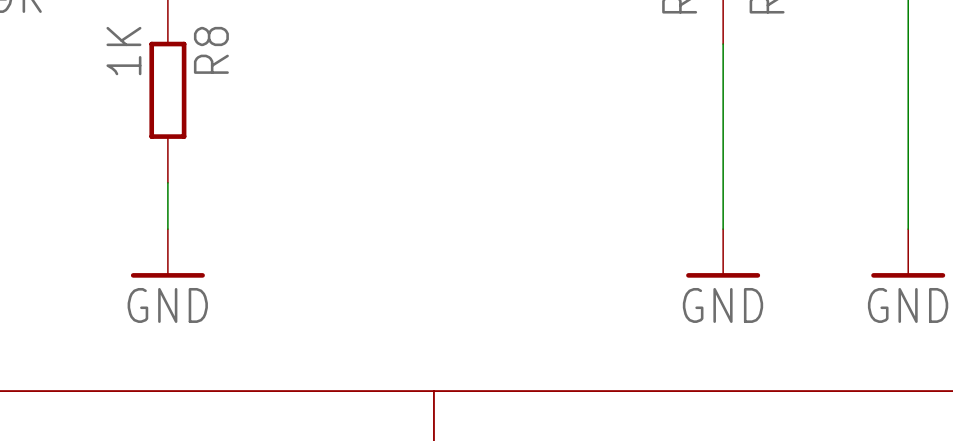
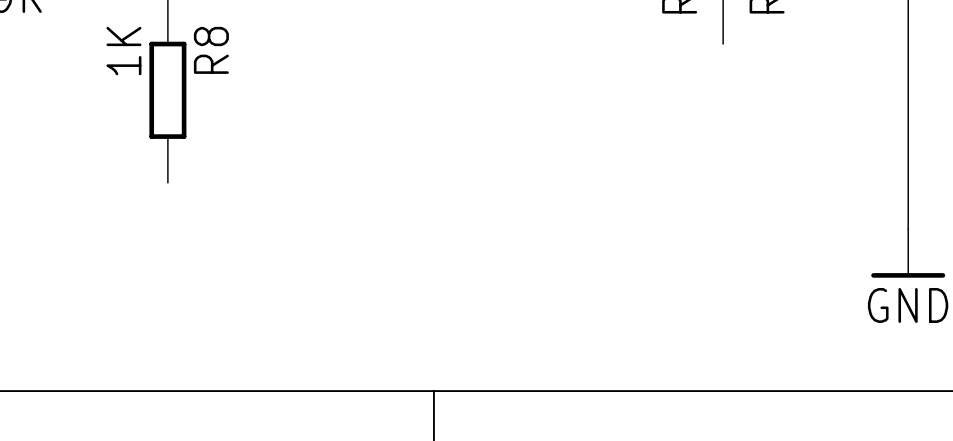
wire: (723, 44) (723, 229) -> none
wire: (167, 182) (167, 229) -> none
power symbol: GND (167, 253) -> none
power symbol: GND (723, 253) -> none

